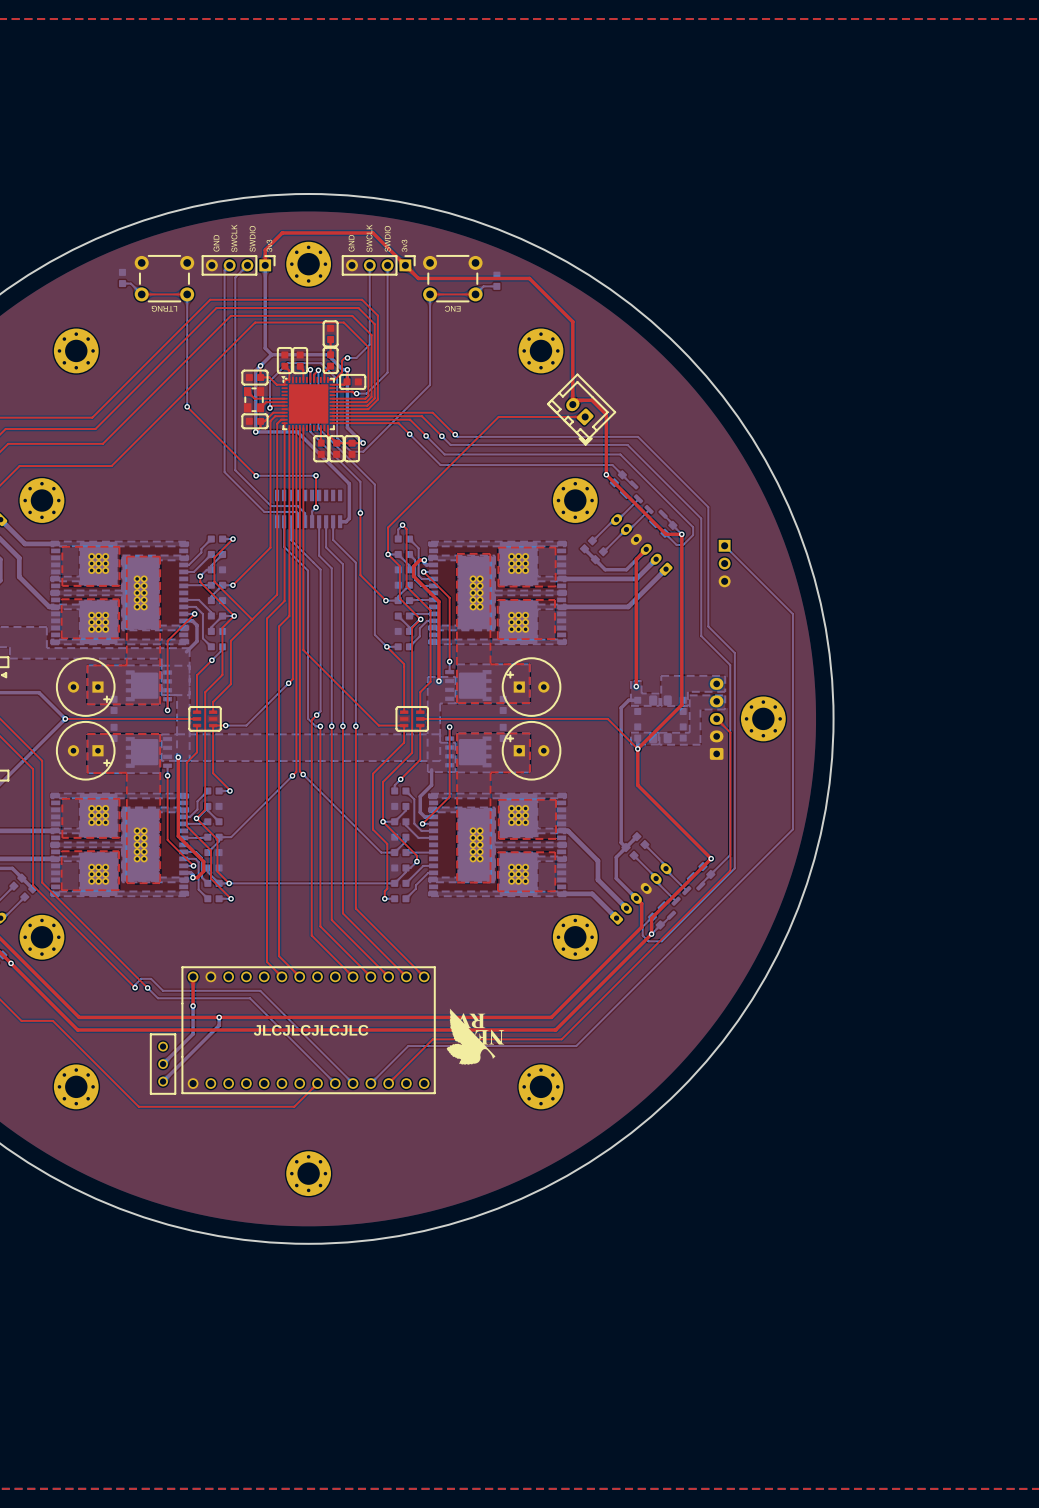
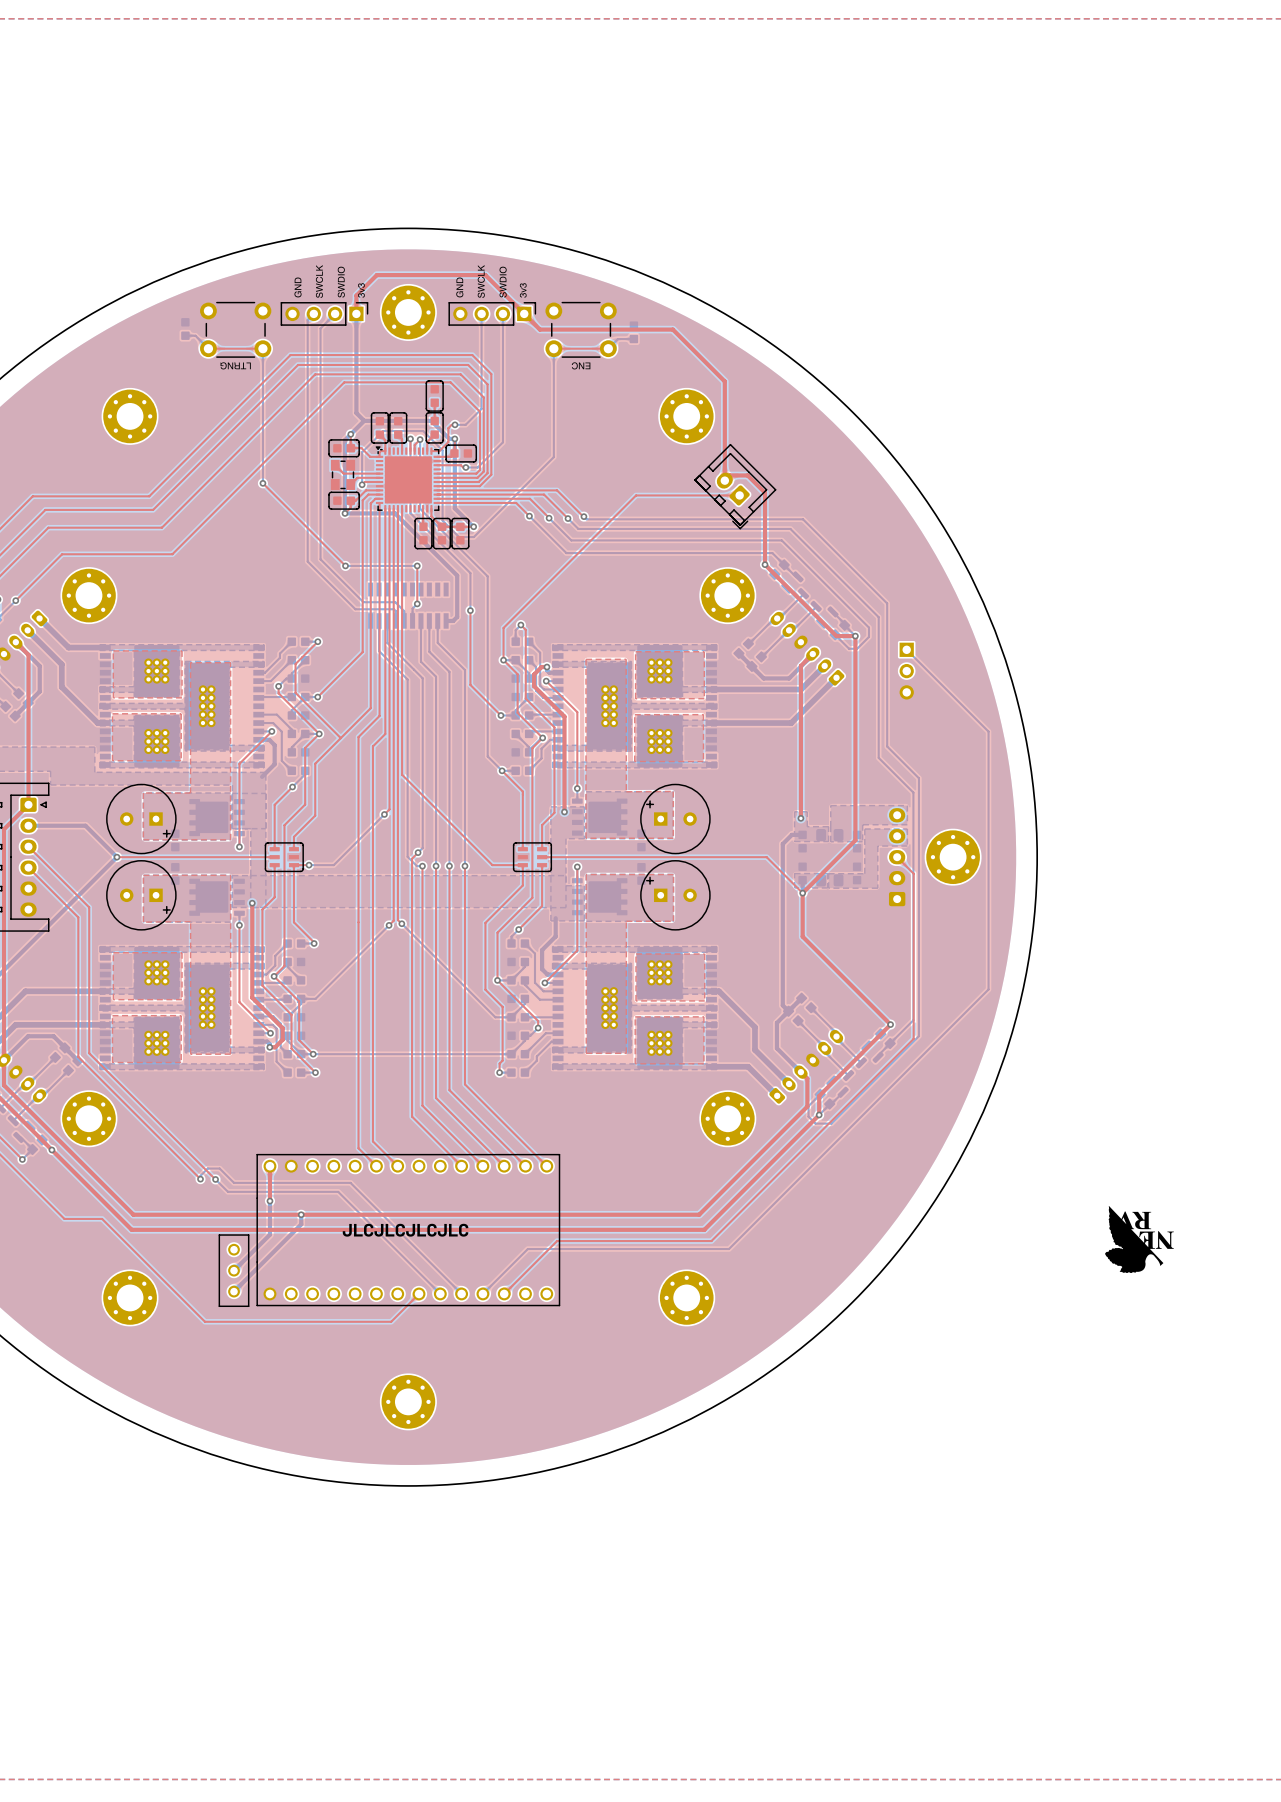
drawing: [446, 1008, 505, 1065] -> none
drawing: none -> [1105, 1205, 1174, 1273]

